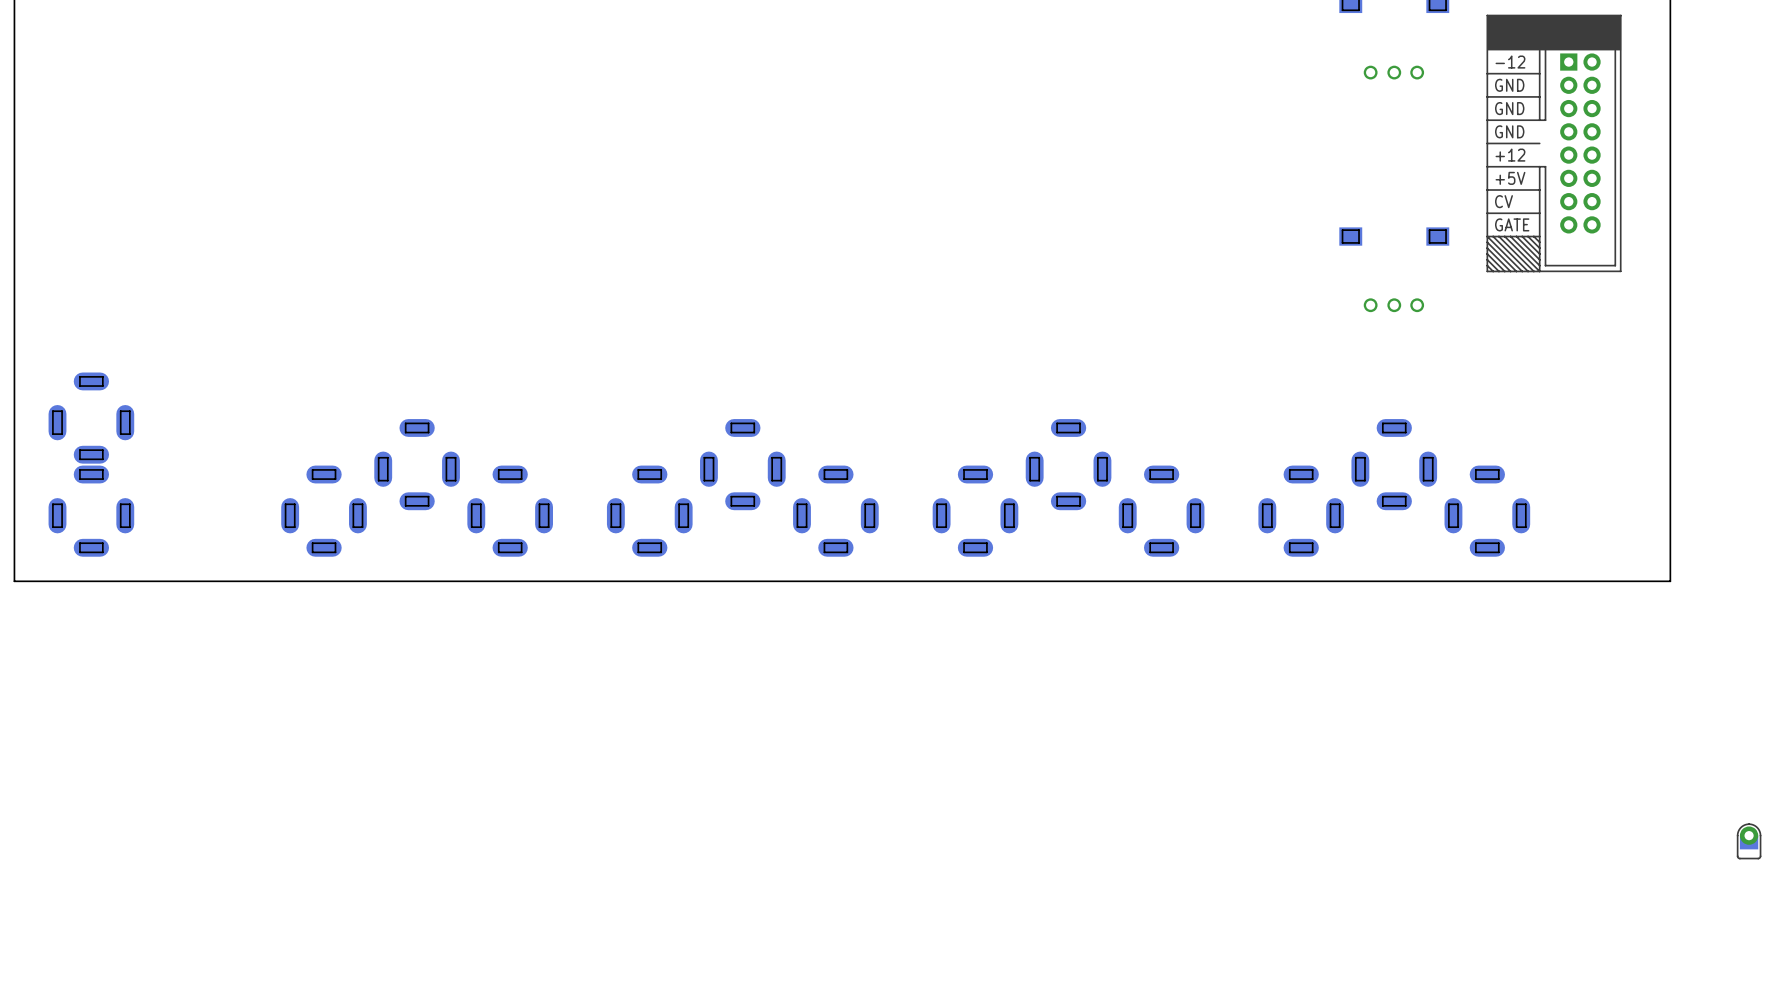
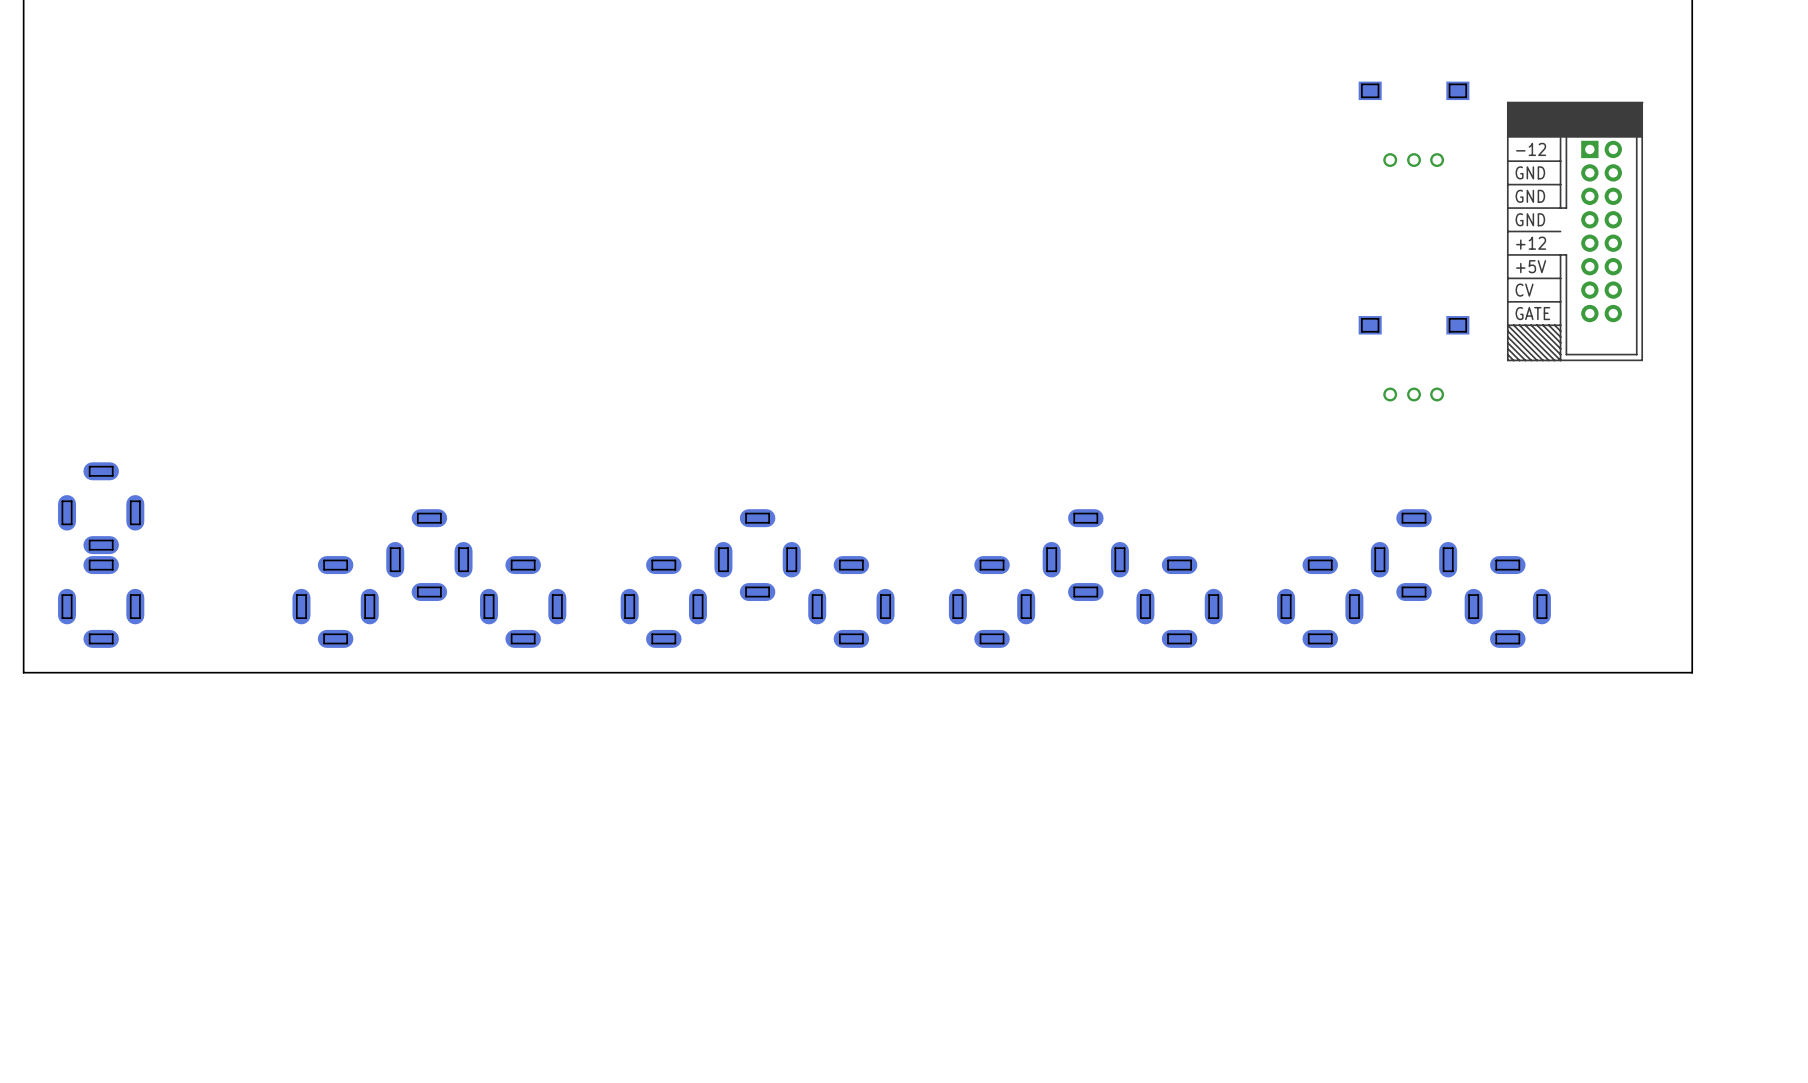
part: (1749, 841) -> none

